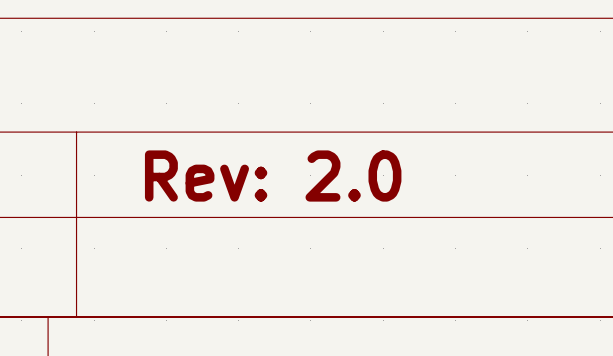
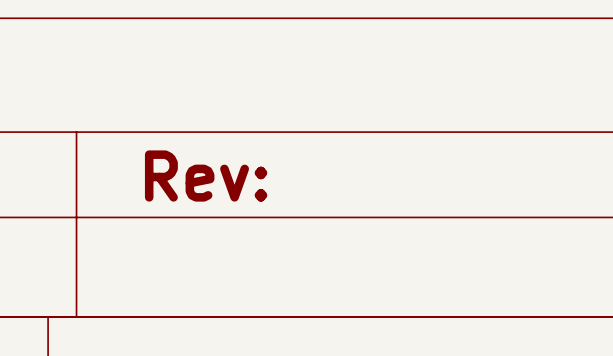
title block: Rev: 2.0 (273, 176) -> Rev: (206, 176)

